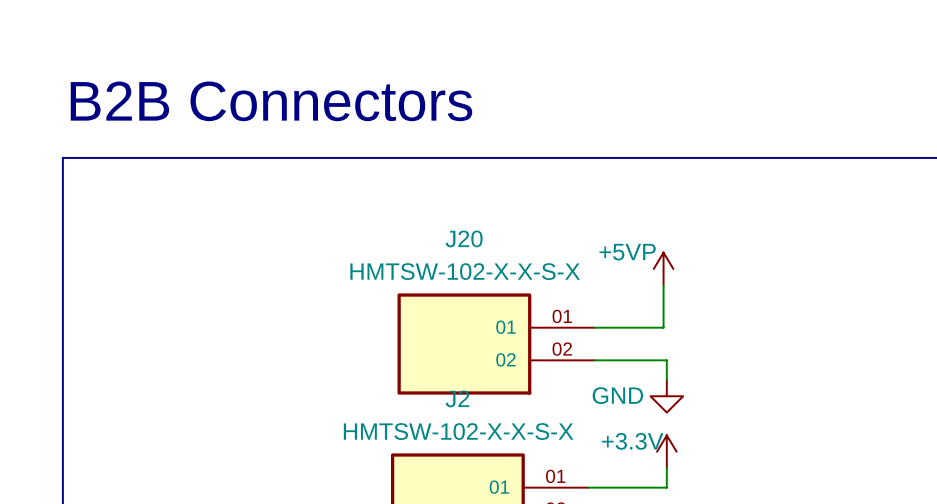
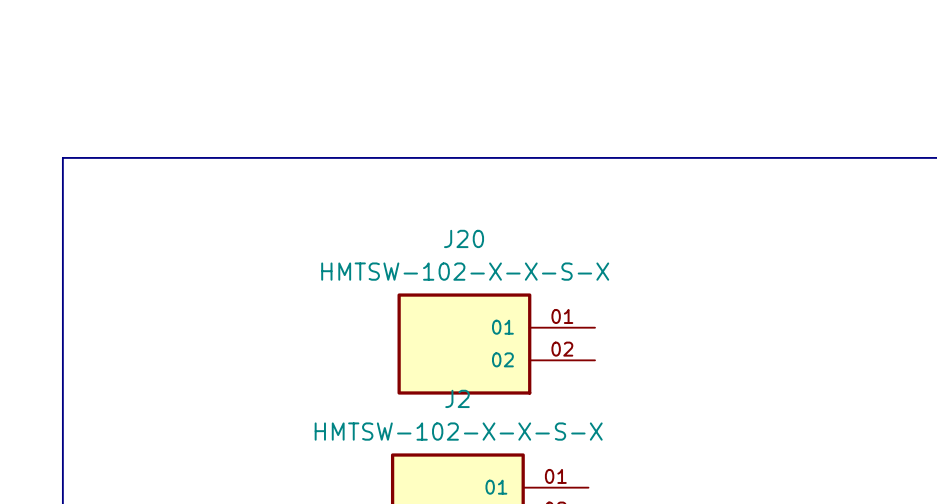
text: B2B Connectors (271, 101) -> none
power symbol: +5VP (663, 268) -> none
wire: (663, 285) (663, 327) (595, 327) -> none
wire: (595, 360) (666, 360) (666, 379) -> none
power symbol: GND (666, 396) -> none
power symbol: +3.3V (666, 451) -> none
wire: (666, 468) (666, 487) (588, 487) -> none

